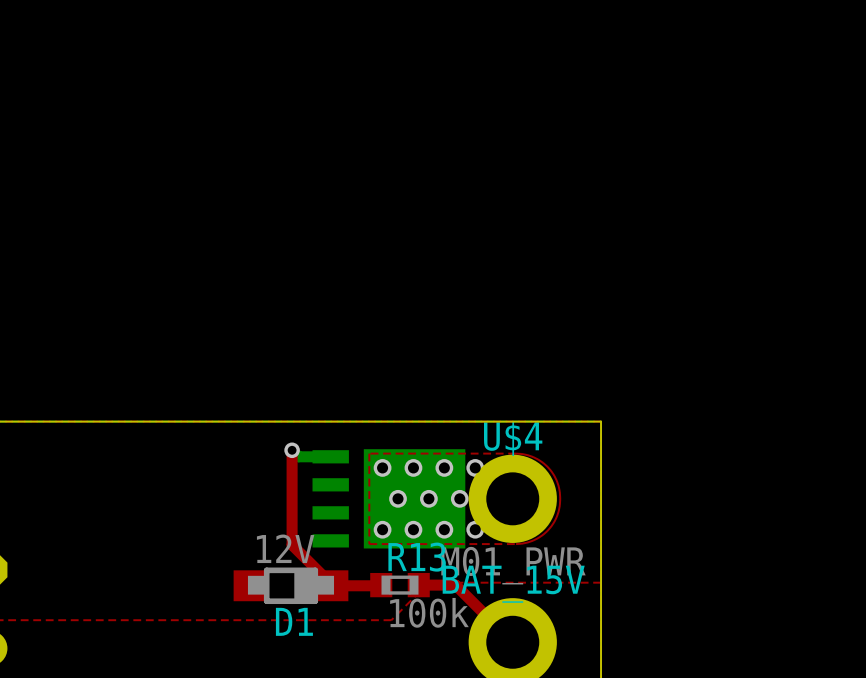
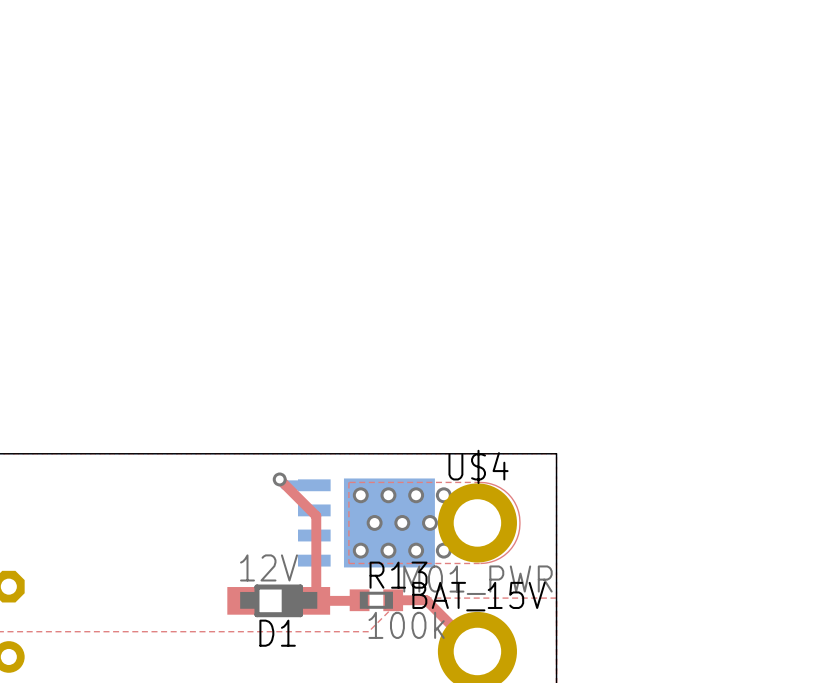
top track: (292, 450) (292, 544) (332, 585) -> (279, 479) (316, 516) (316, 600)

